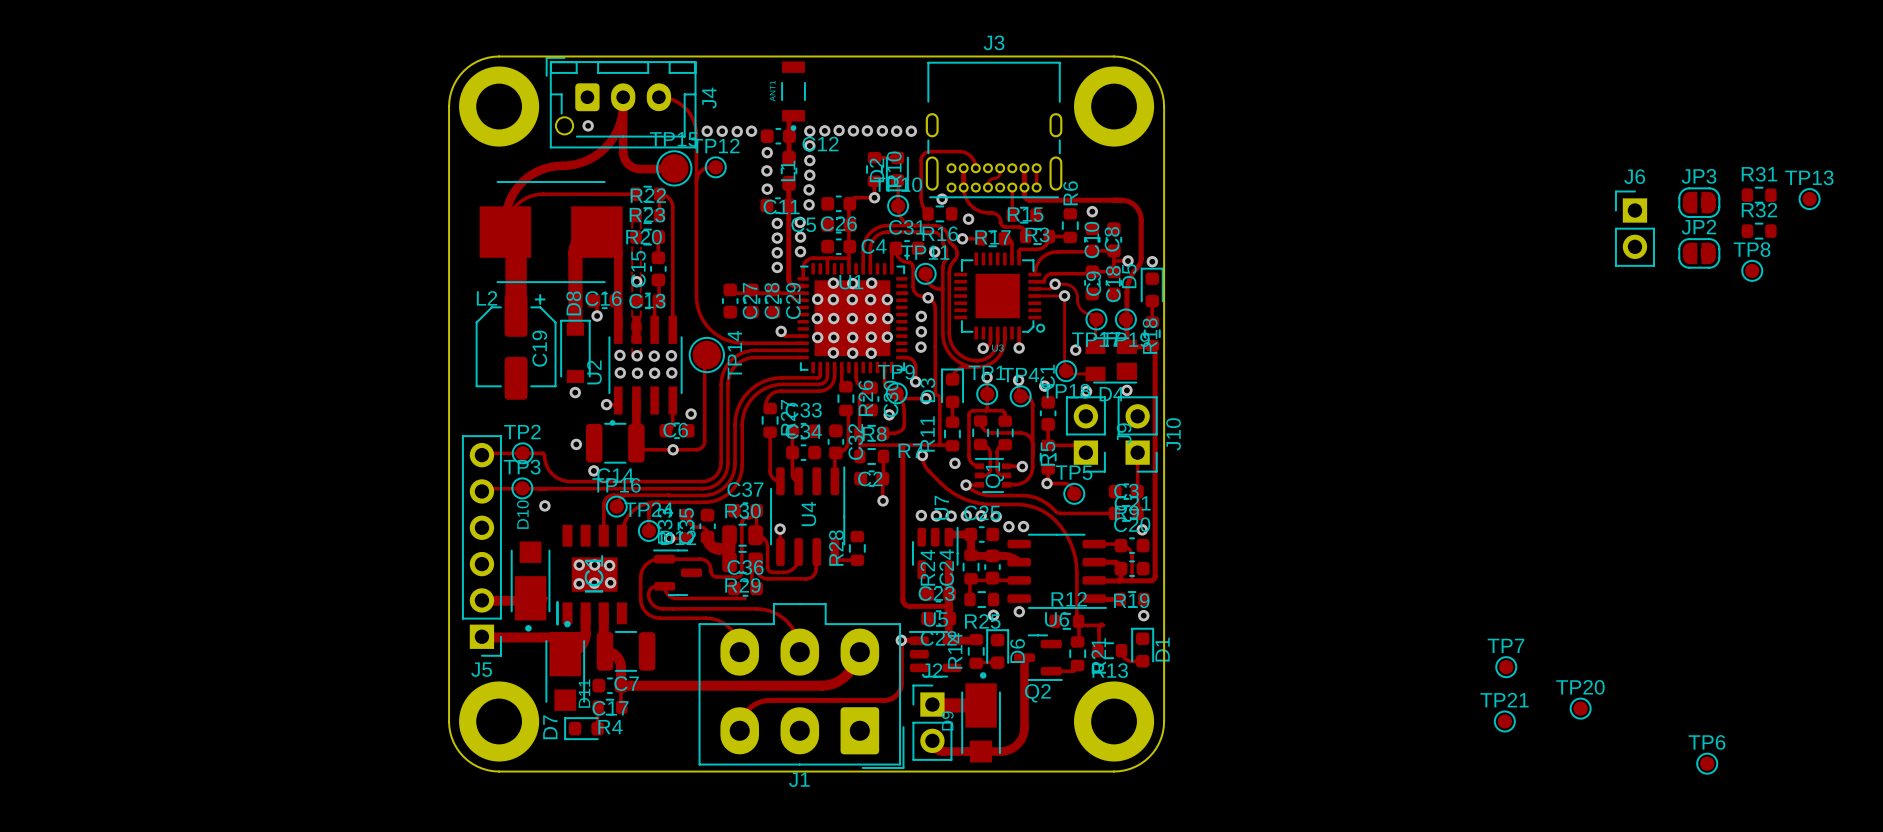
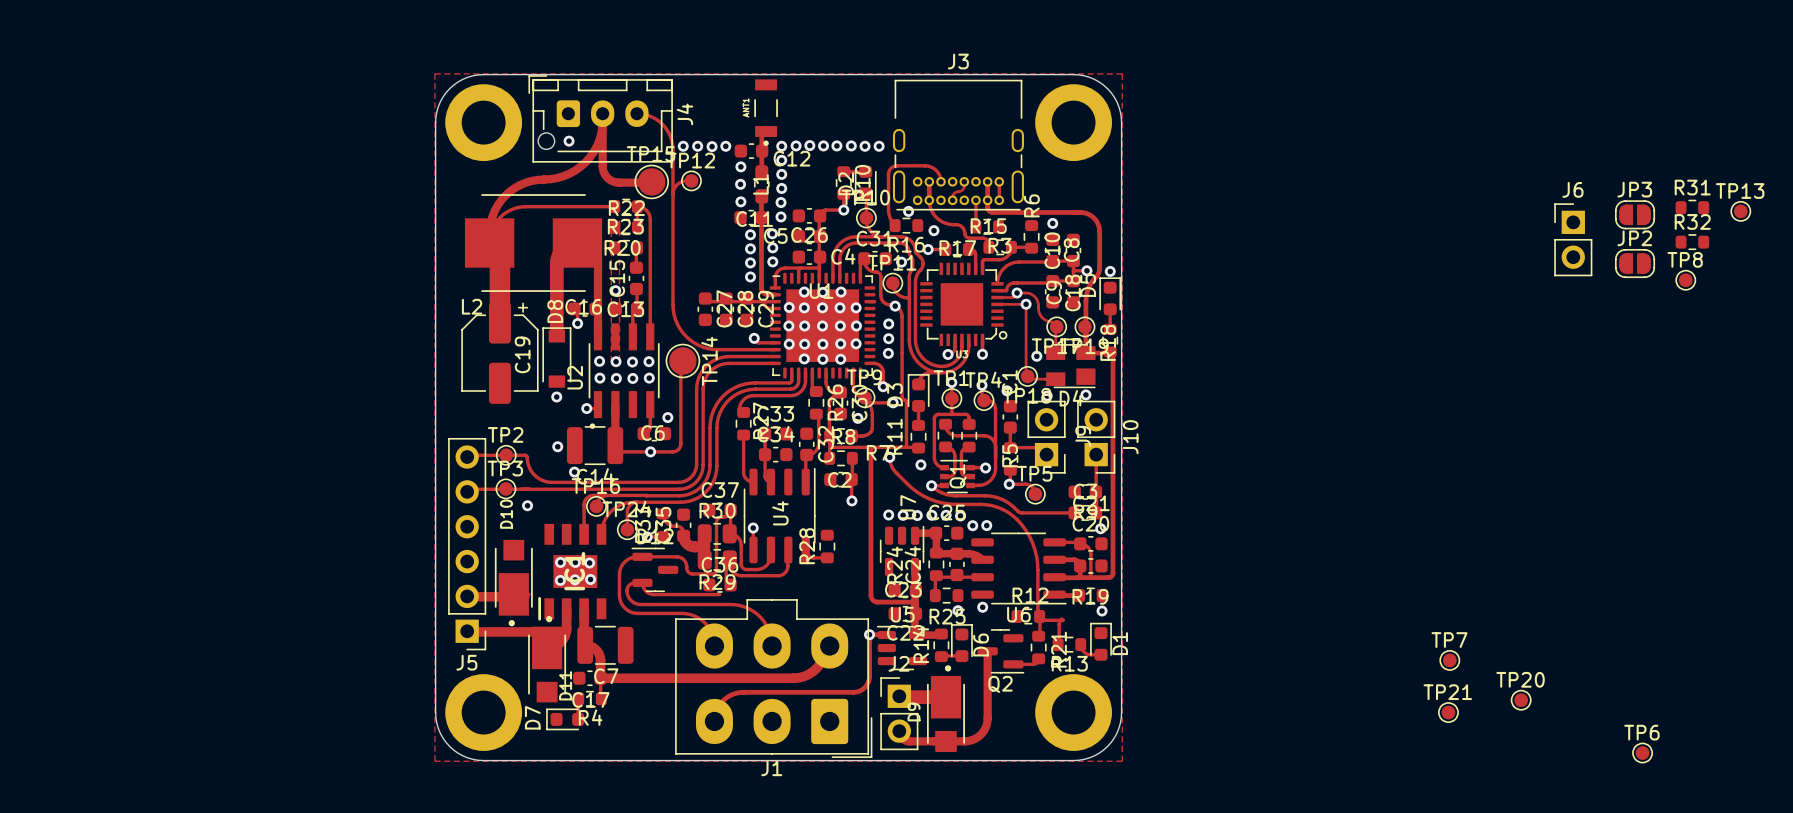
zone outline: none -> (434, 73) (434, 761) (1122, 761) (1122, 73) (434, 73)

